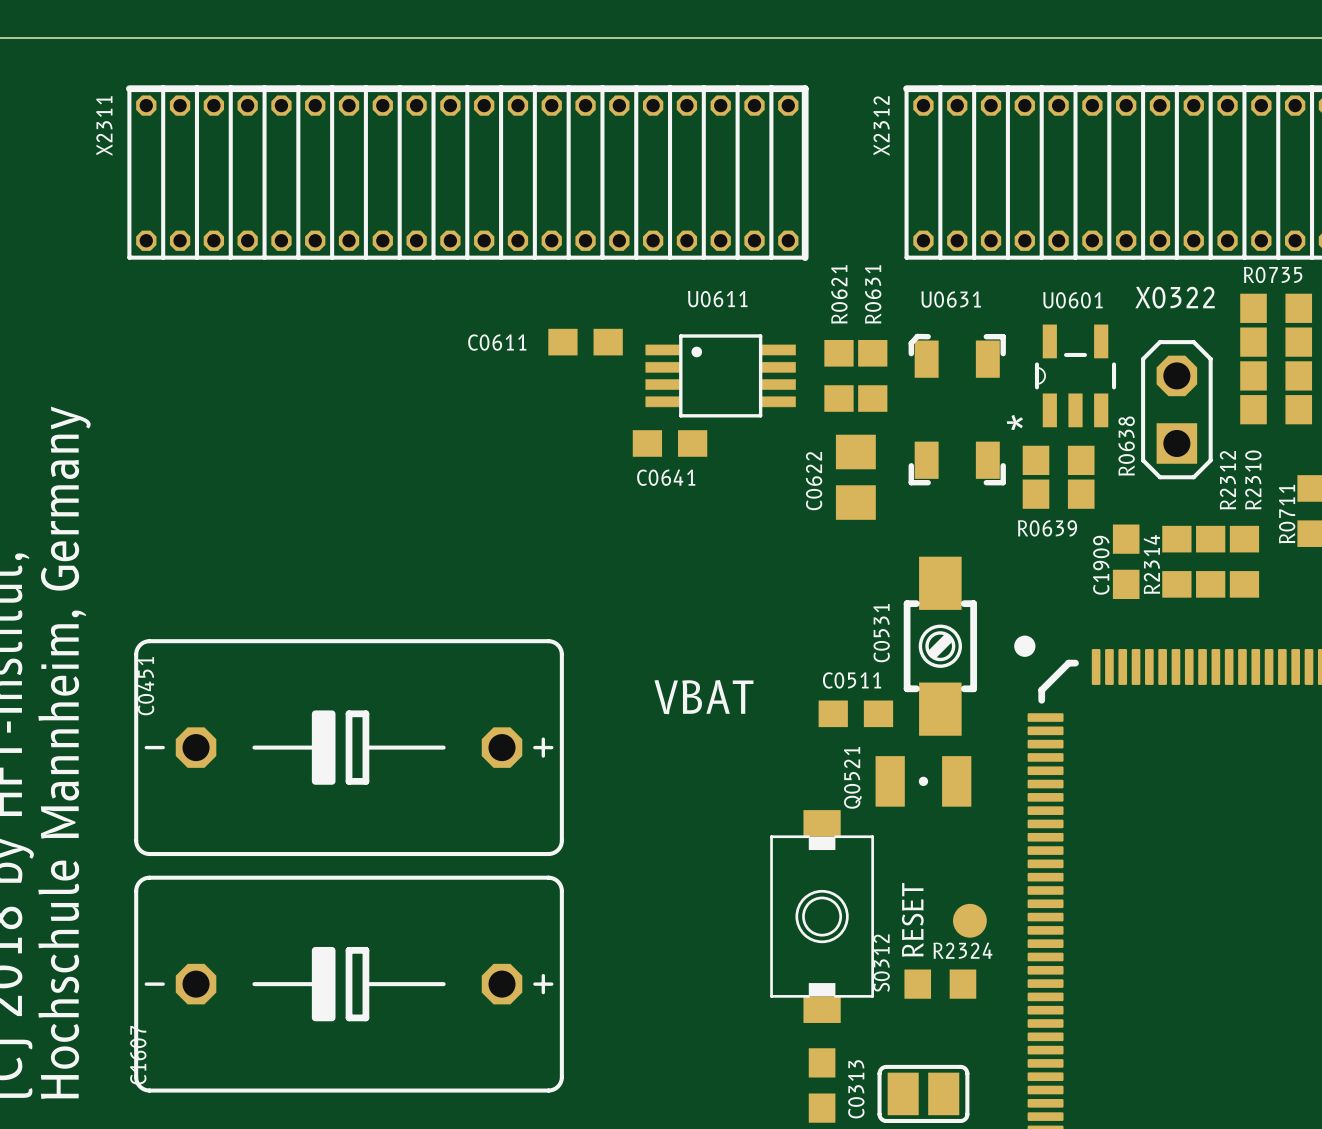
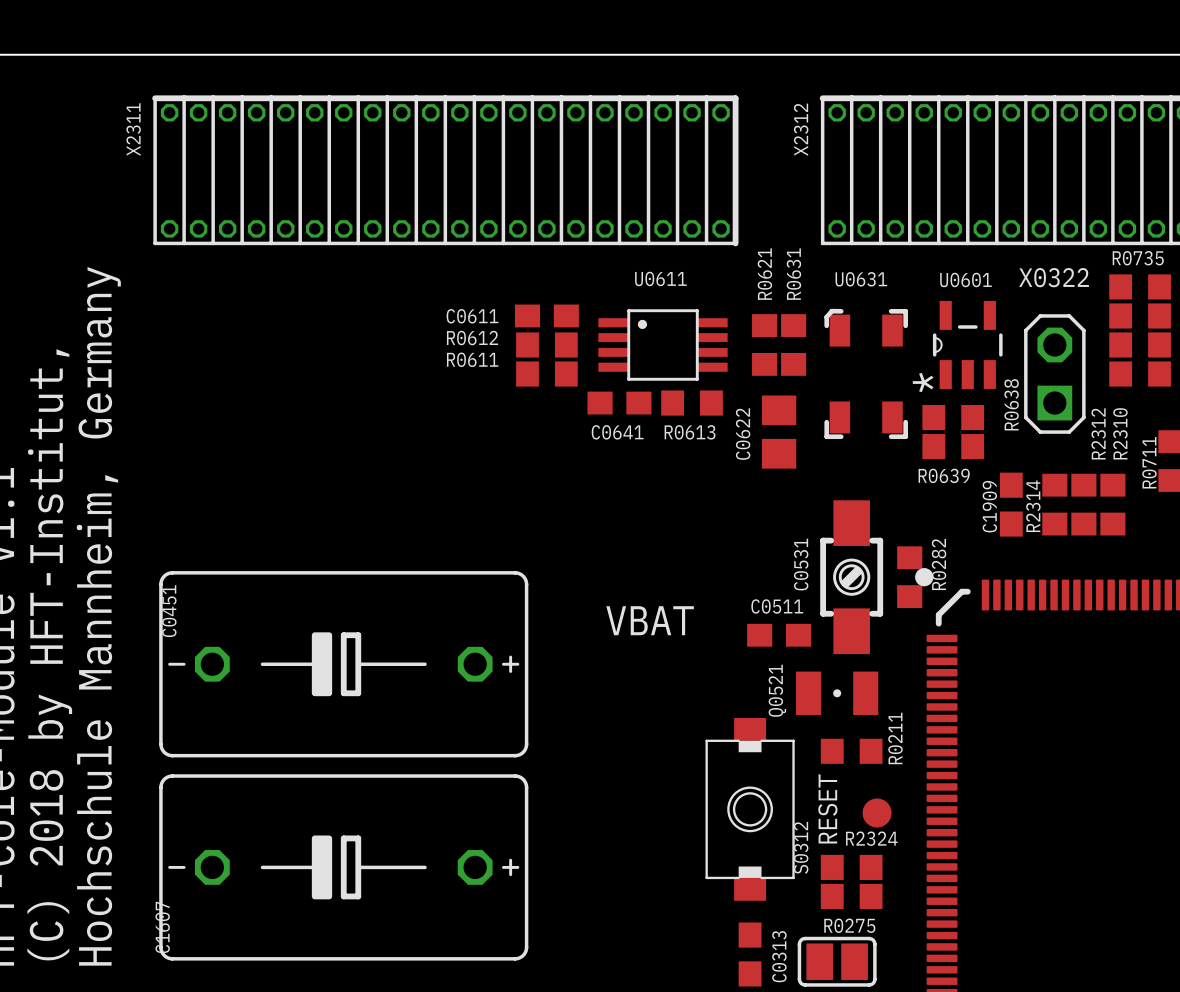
R0612: none -> (546, 344)
R0611: none -> (546, 374)
R0613: none -> (692, 403)
R0282: none -> (909, 577)
R0211: none -> (851, 751)
R0275: none -> (851, 896)

